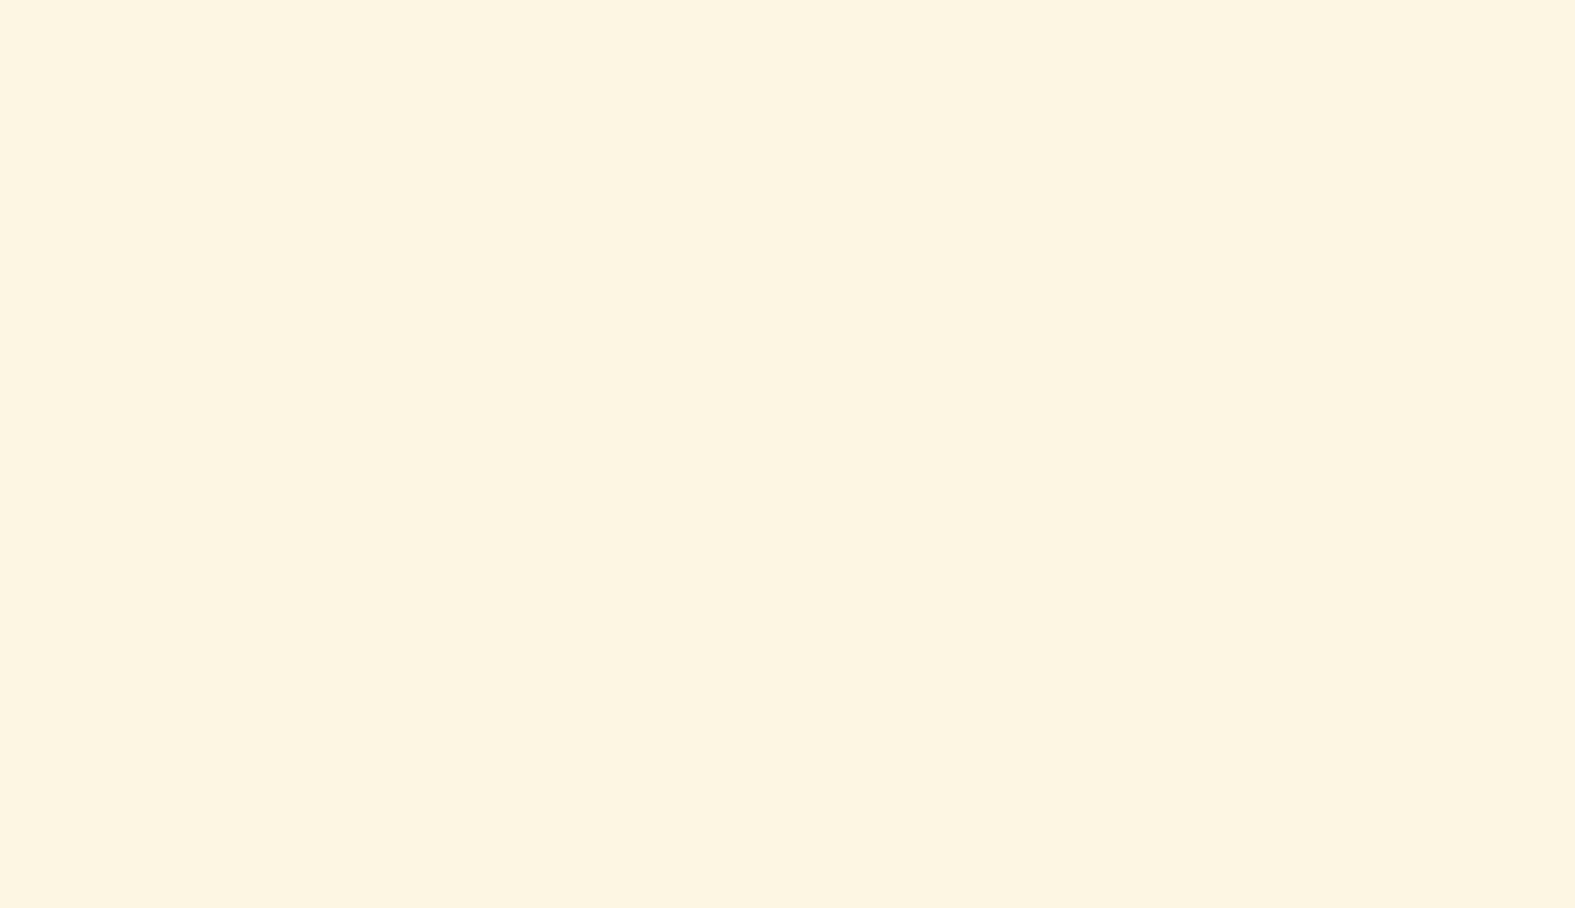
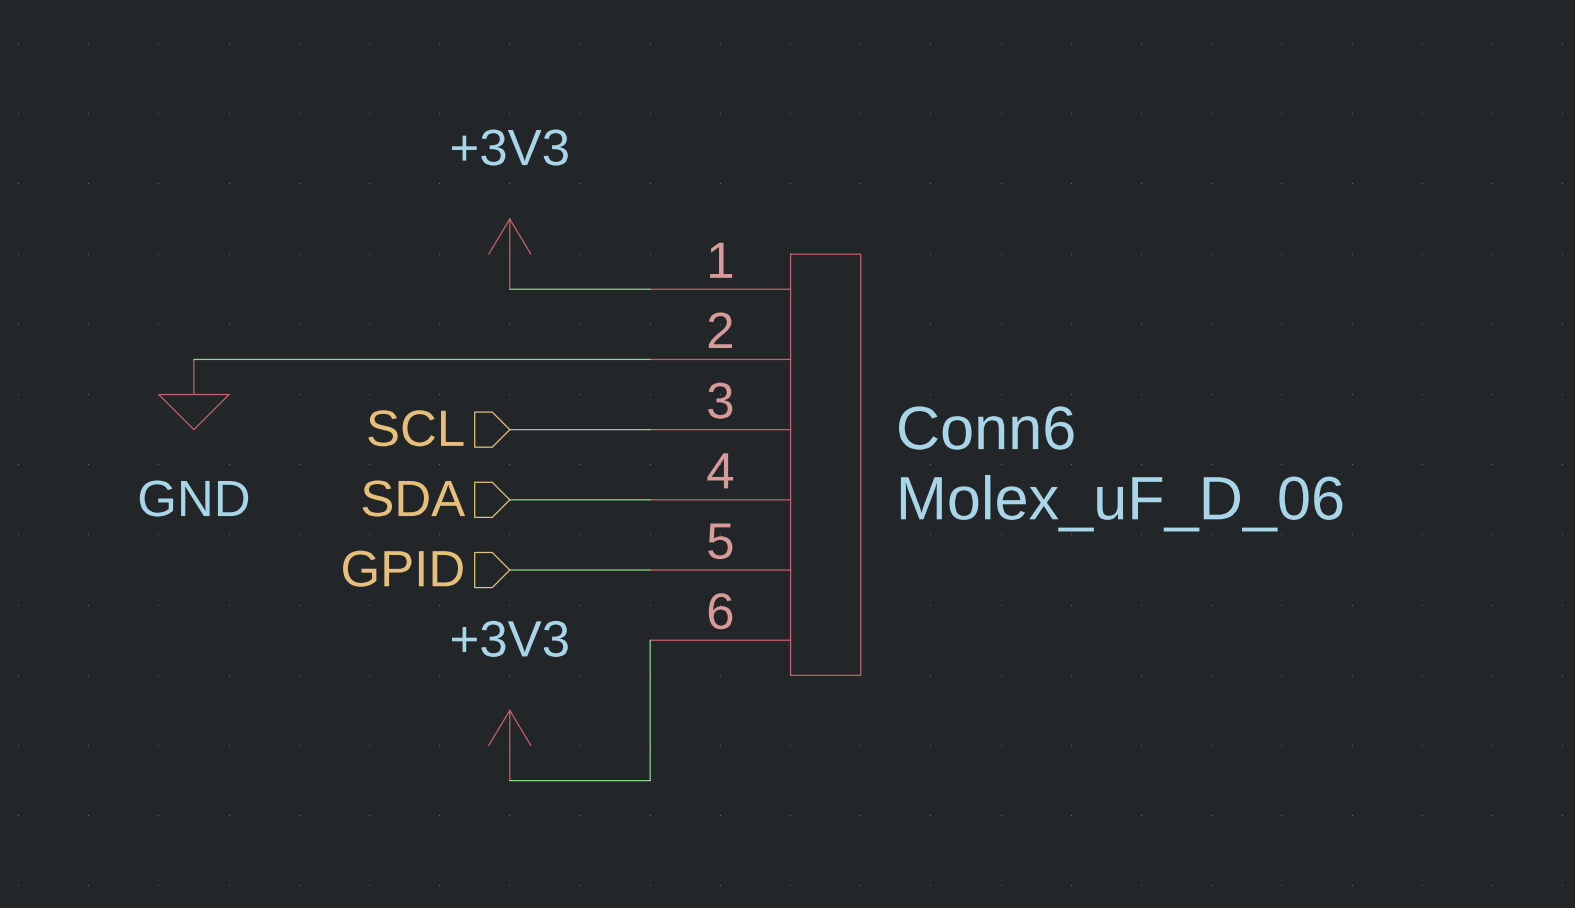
power symbol: none -> +3V3 (509, 254)
wire: none -> (509, 289) (650, 289)
wire: none -> (193, 359) (650, 359)
power symbol: none -> GND (193, 394)
hierarchical label: none -> SCL (415, 428)
wire: none -> (509, 429) (650, 429)
Conn6: none -> Molex_uF_D_06 (755, 464)
hierarchical label: none -> SDA (413, 498)
wire: none -> (509, 499) (650, 499)
hierarchical label: none -> GPID (402, 568)
wire: none -> (509, 570) (650, 570)
wire: none -> (650, 640) (650, 780) (509, 780)
power symbol: none -> +3V3 (509, 745)

